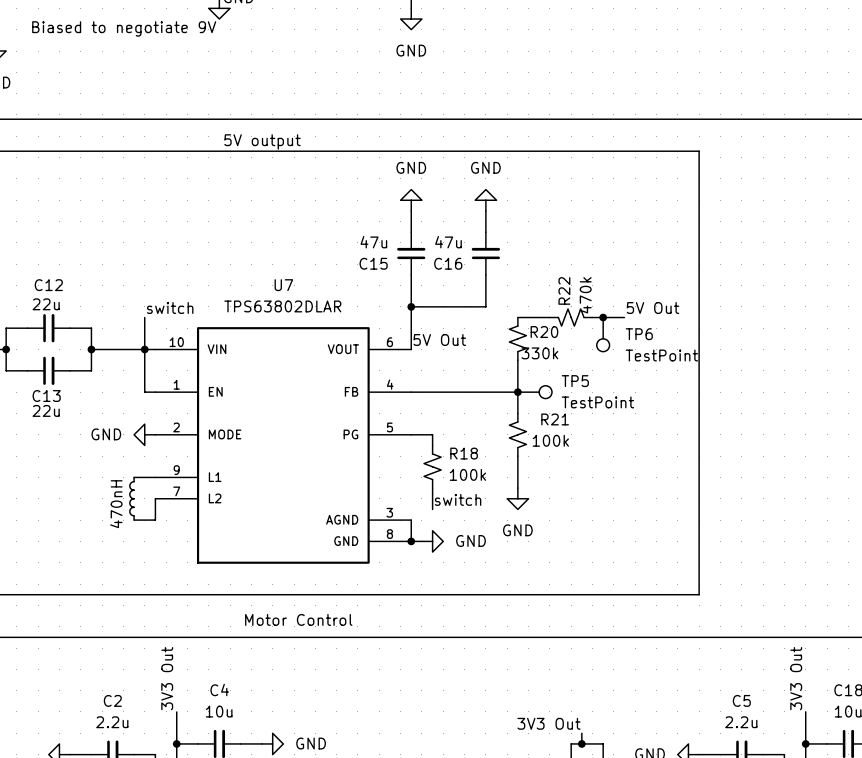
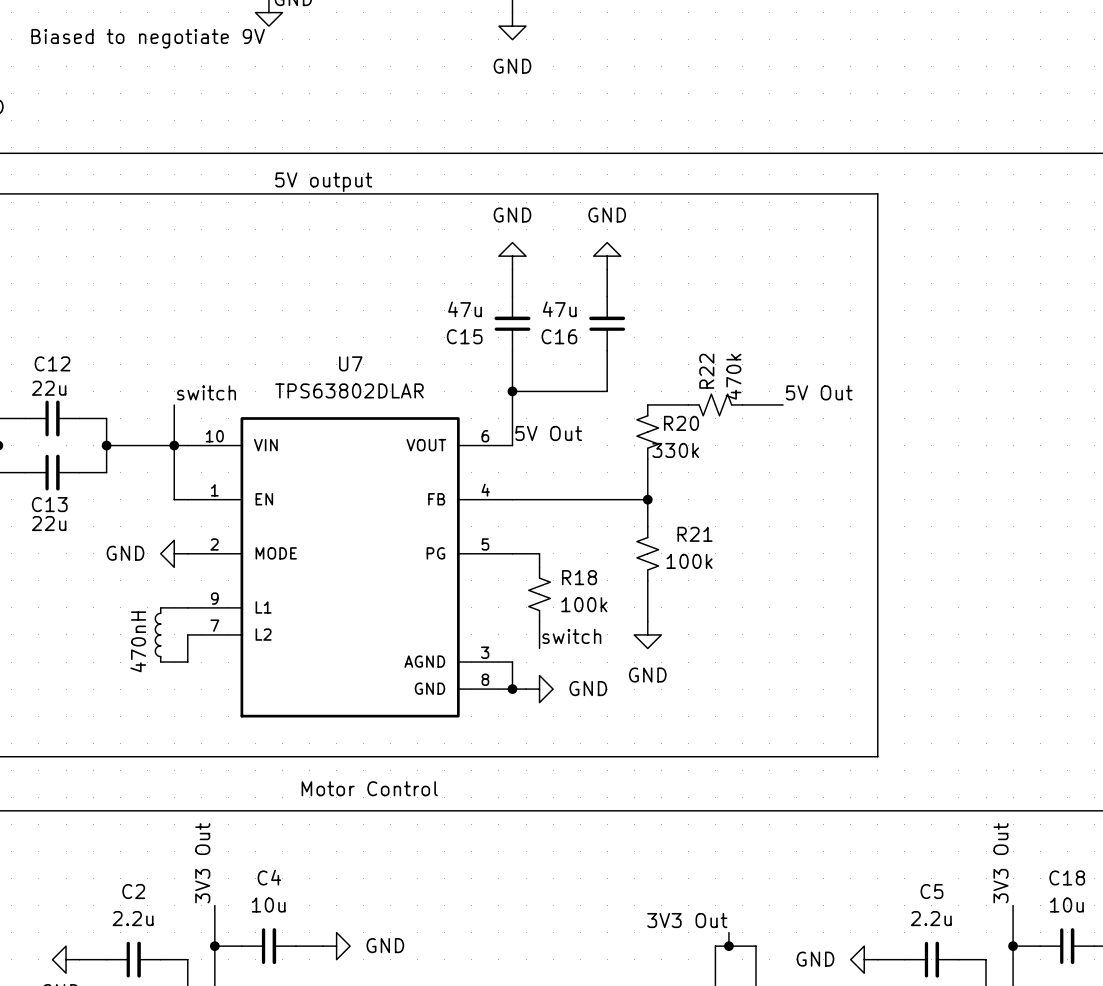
junction: (603, 317) -> none
TP6: TestPoint (603, 334) -> none
TP5: TestPoint (534, 392) -> none

